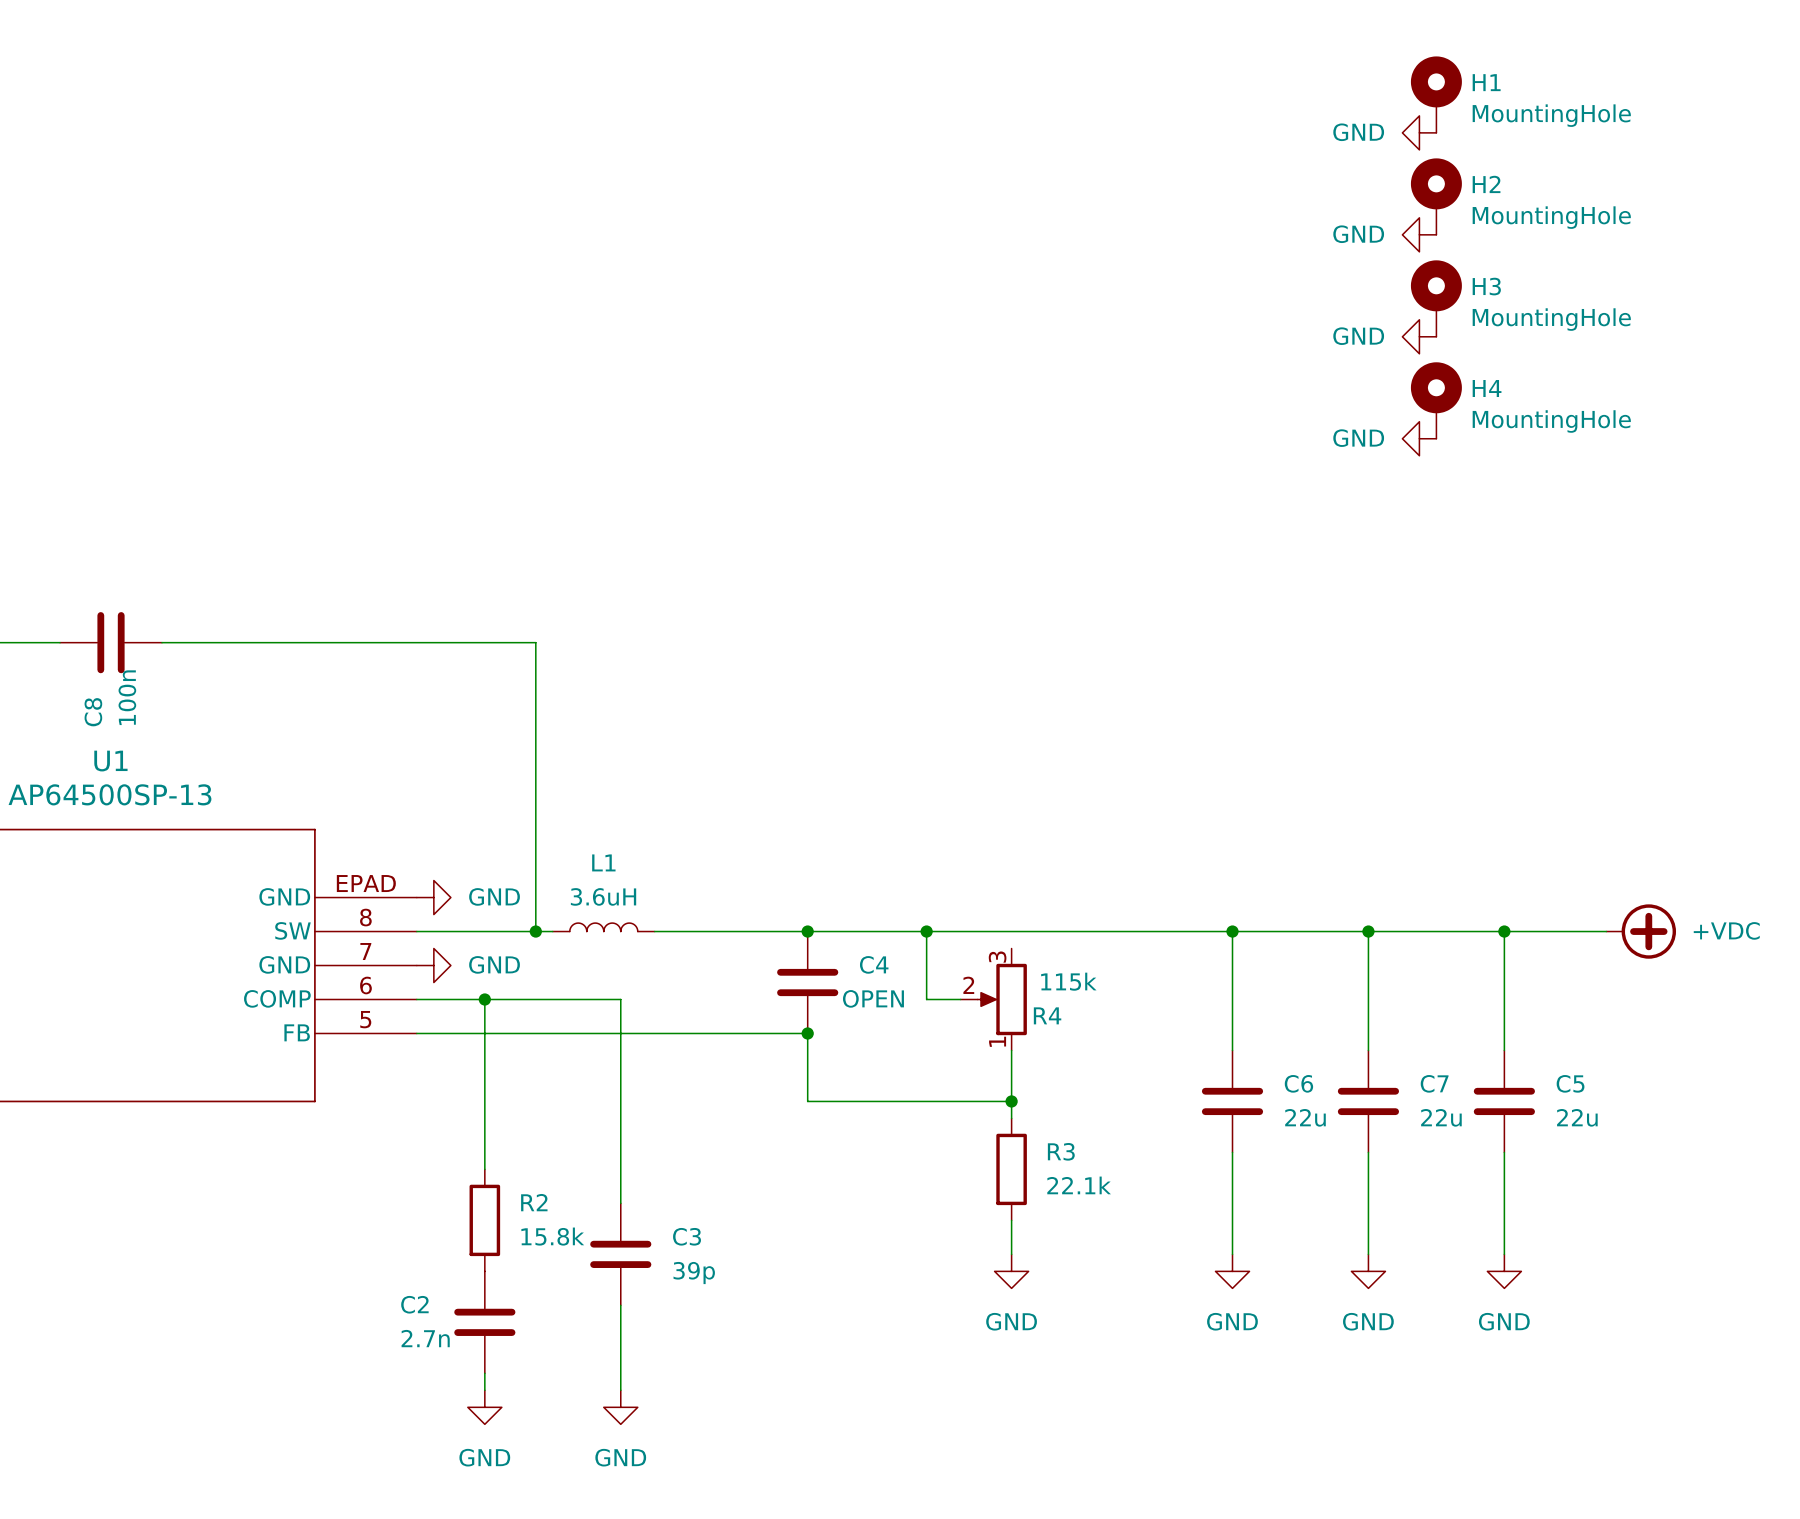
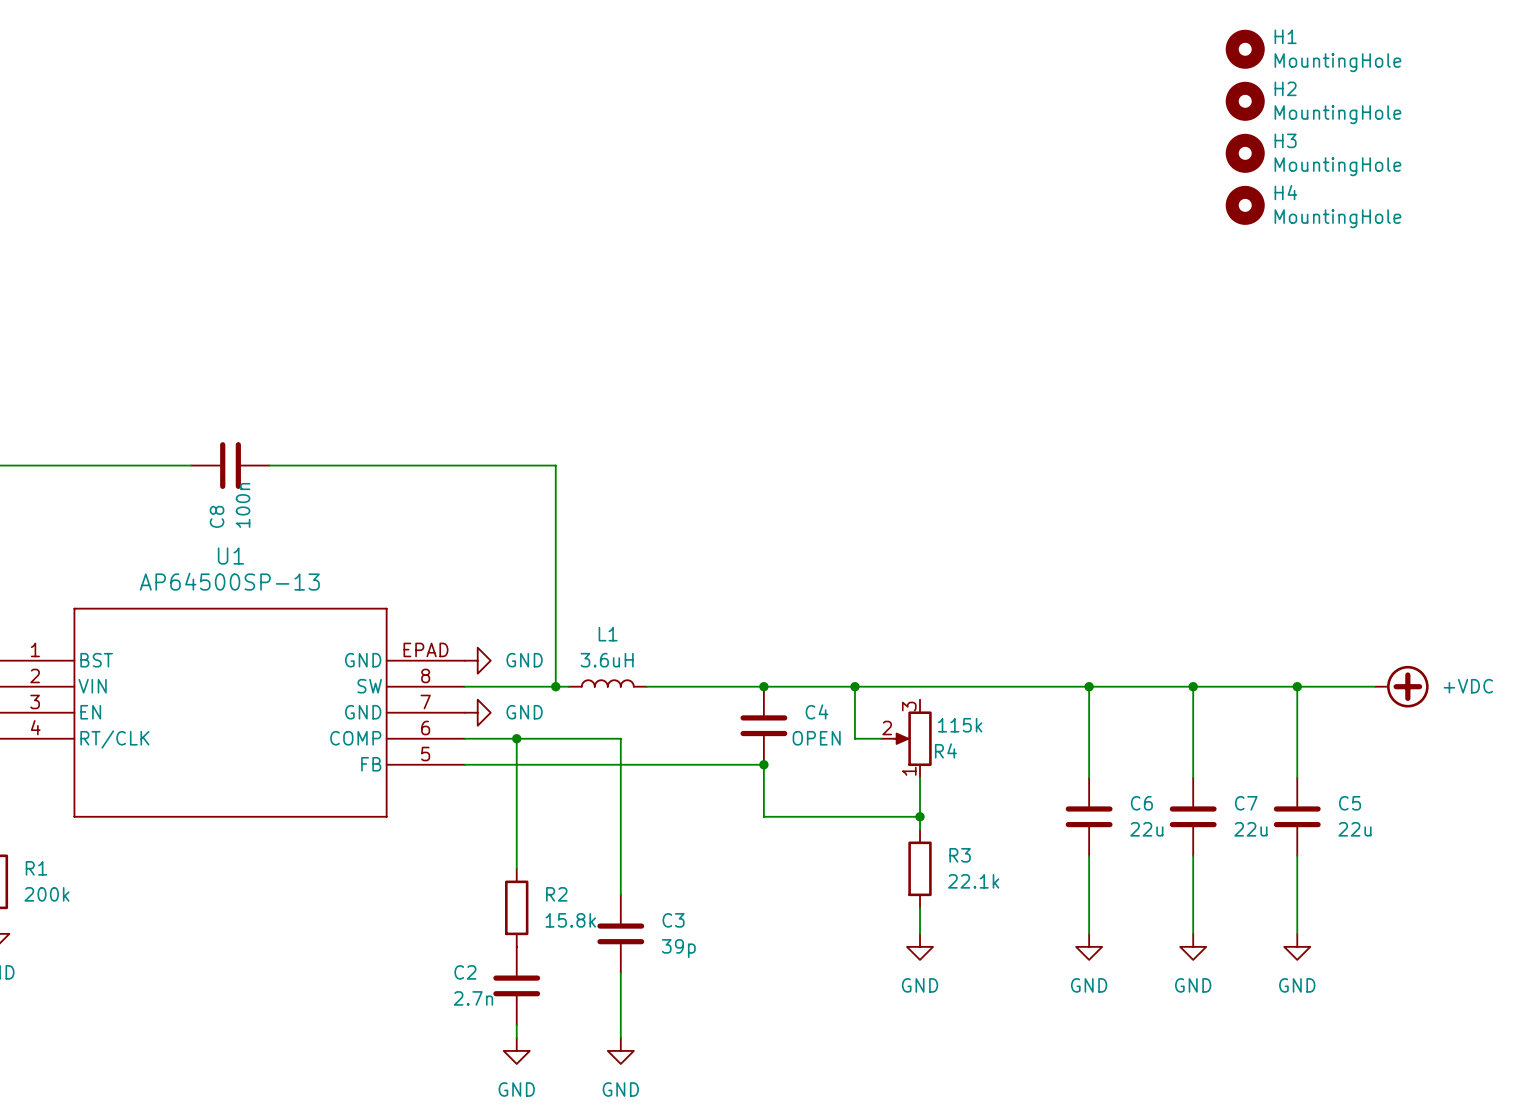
H1 symbol: [1410, 56, 1462, 133] -> [1225, 29, 1265, 69]
power symbol: GND (1419, 132) -> none
H2 symbol: [1410, 158, 1462, 235] -> [1225, 81, 1265, 121]
power symbol: GND (1419, 234) -> none
H3 symbol: [1410, 260, 1462, 337] -> [1225, 133, 1265, 173]
power symbol: GND (1419, 336) -> none
H4 symbol: [1410, 362, 1462, 439] -> [1225, 185, 1265, 225]
power symbol: GND (1419, 438) -> none

